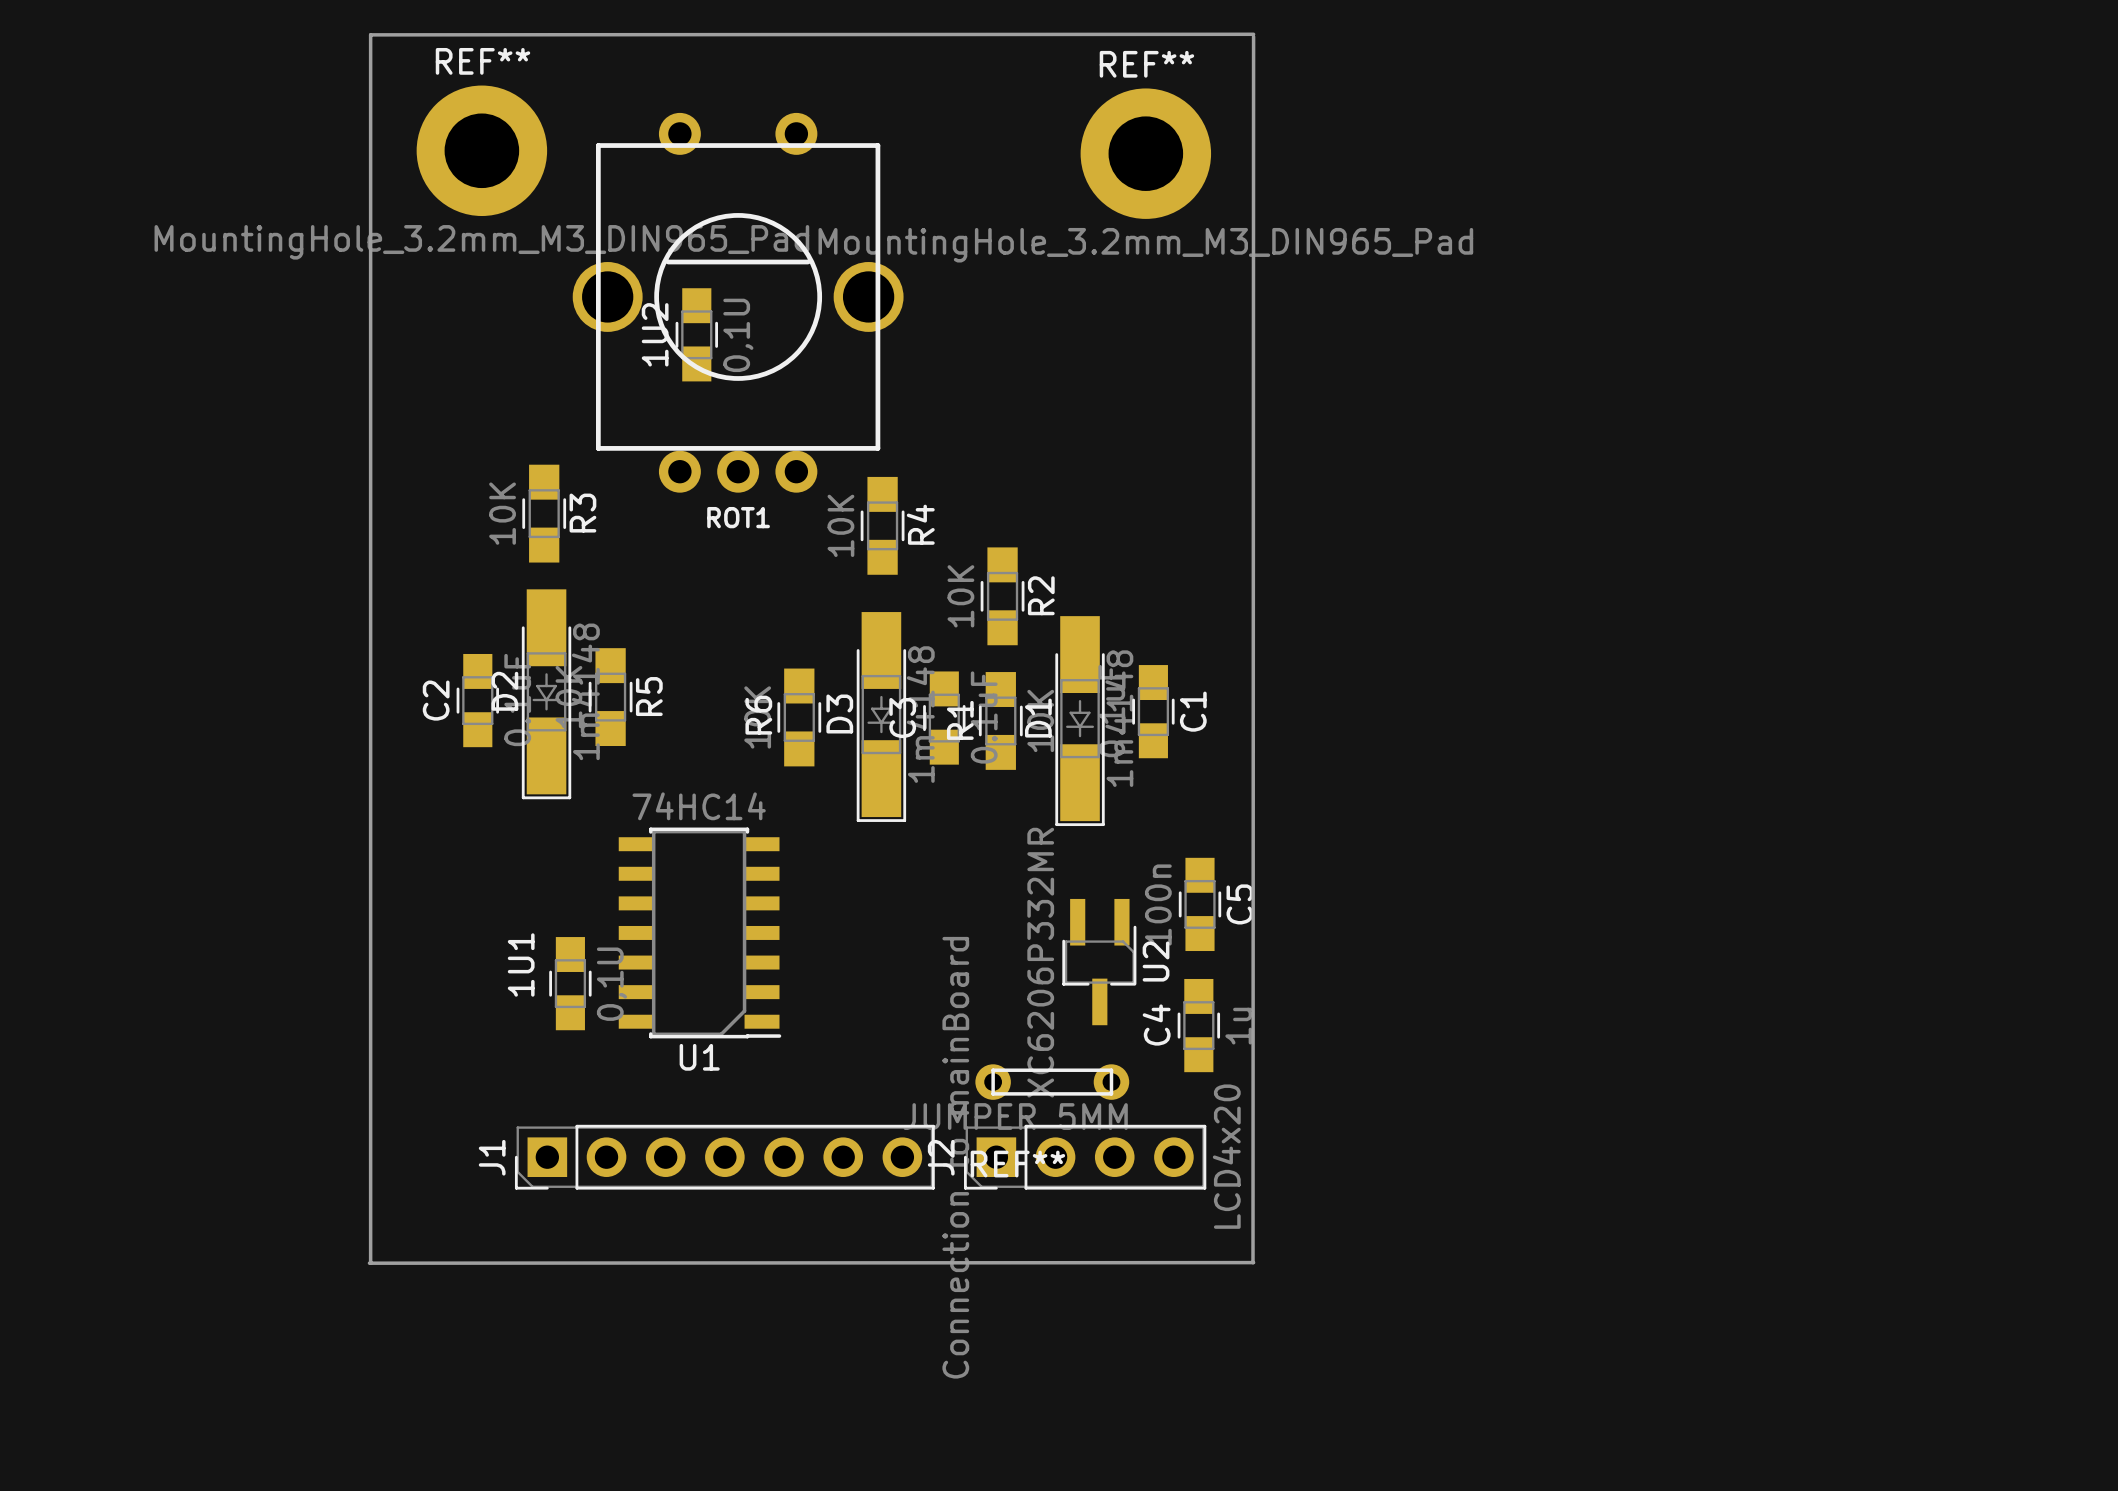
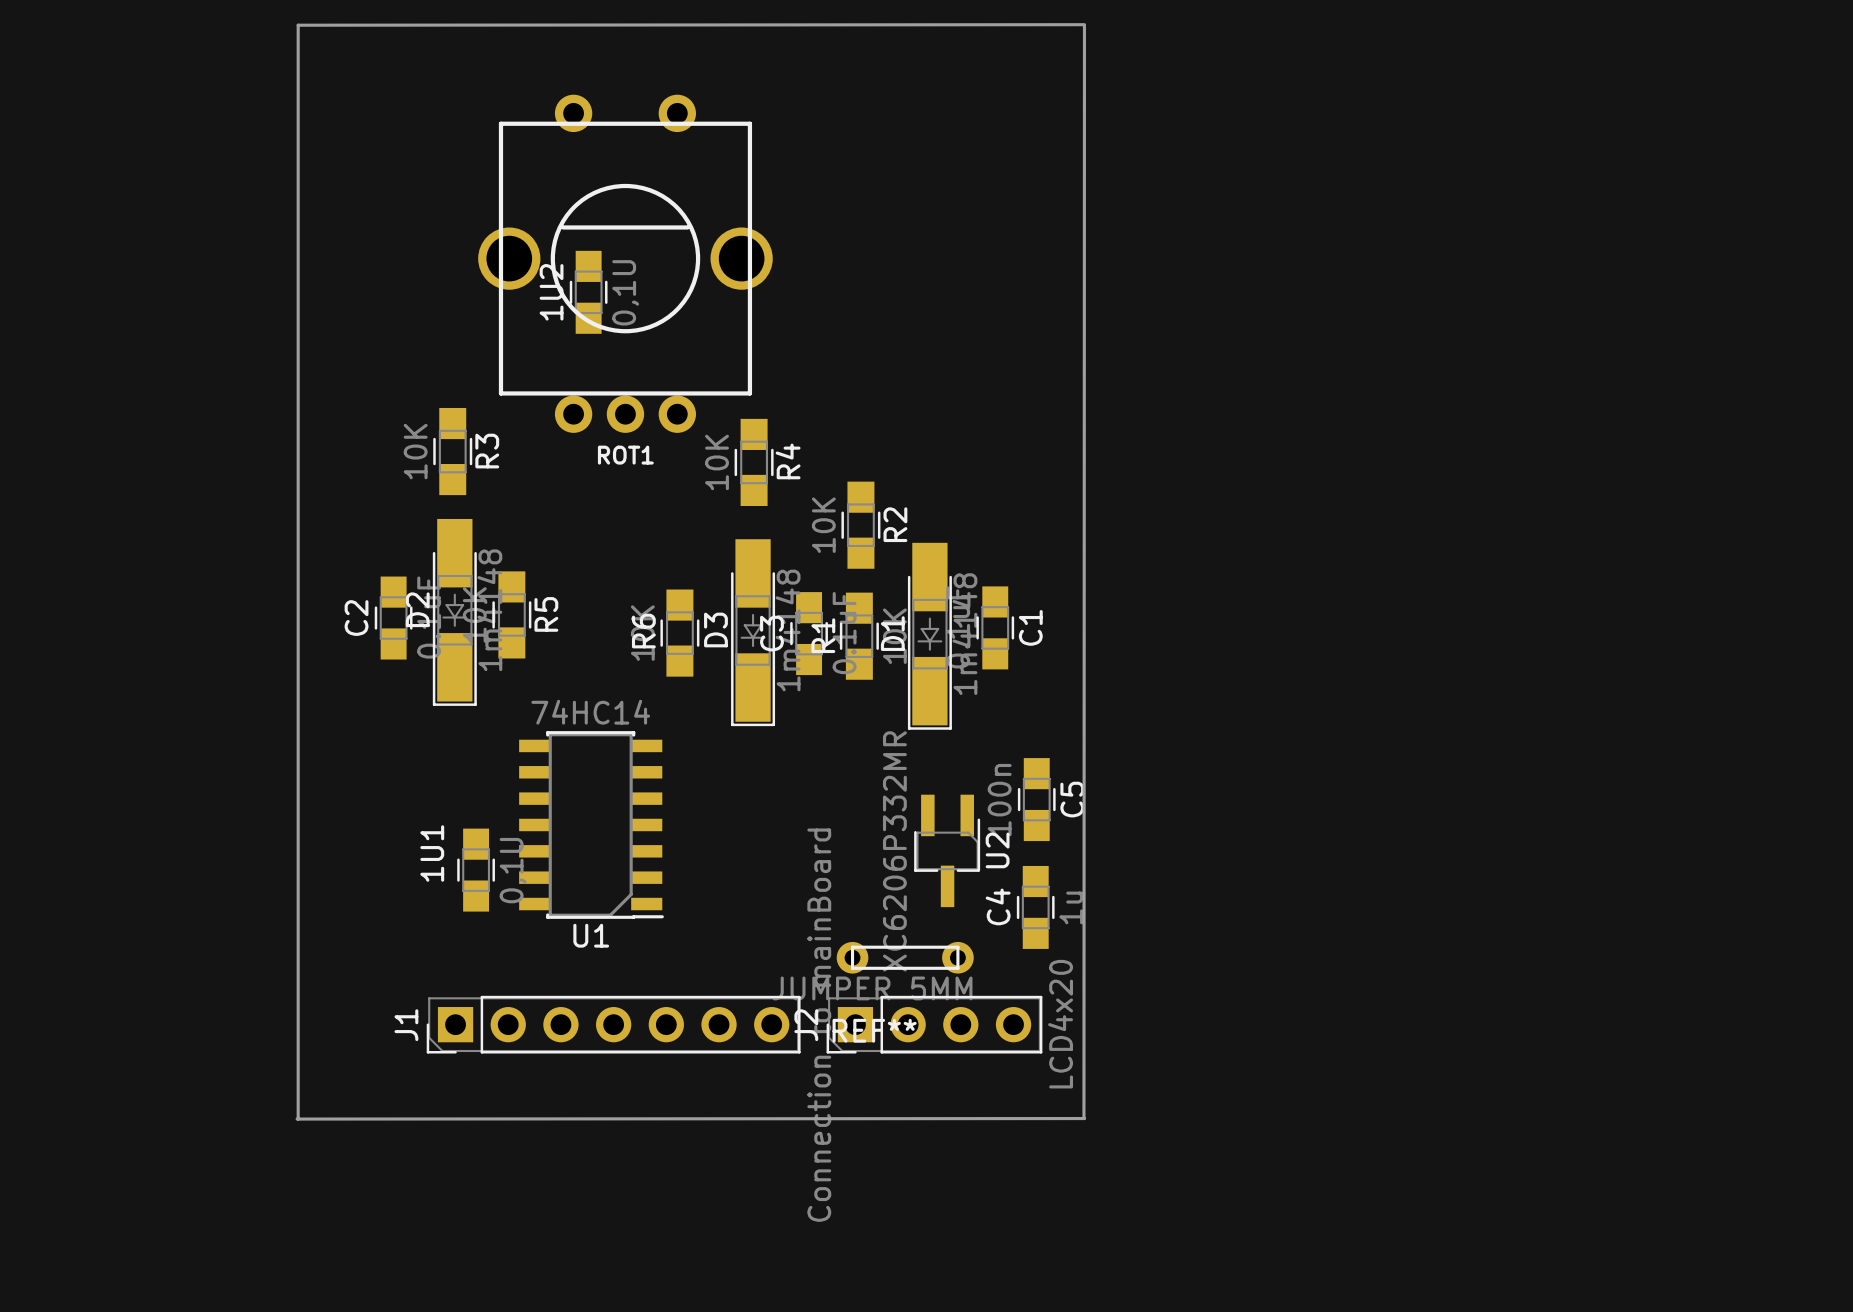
REF**: MountingHole_3.2mm_M3_DIN965_Pad (481, 150) -> none
REF**: MountingHole_3.2mm_M3_DIN965_Pad (1145, 153) -> none

